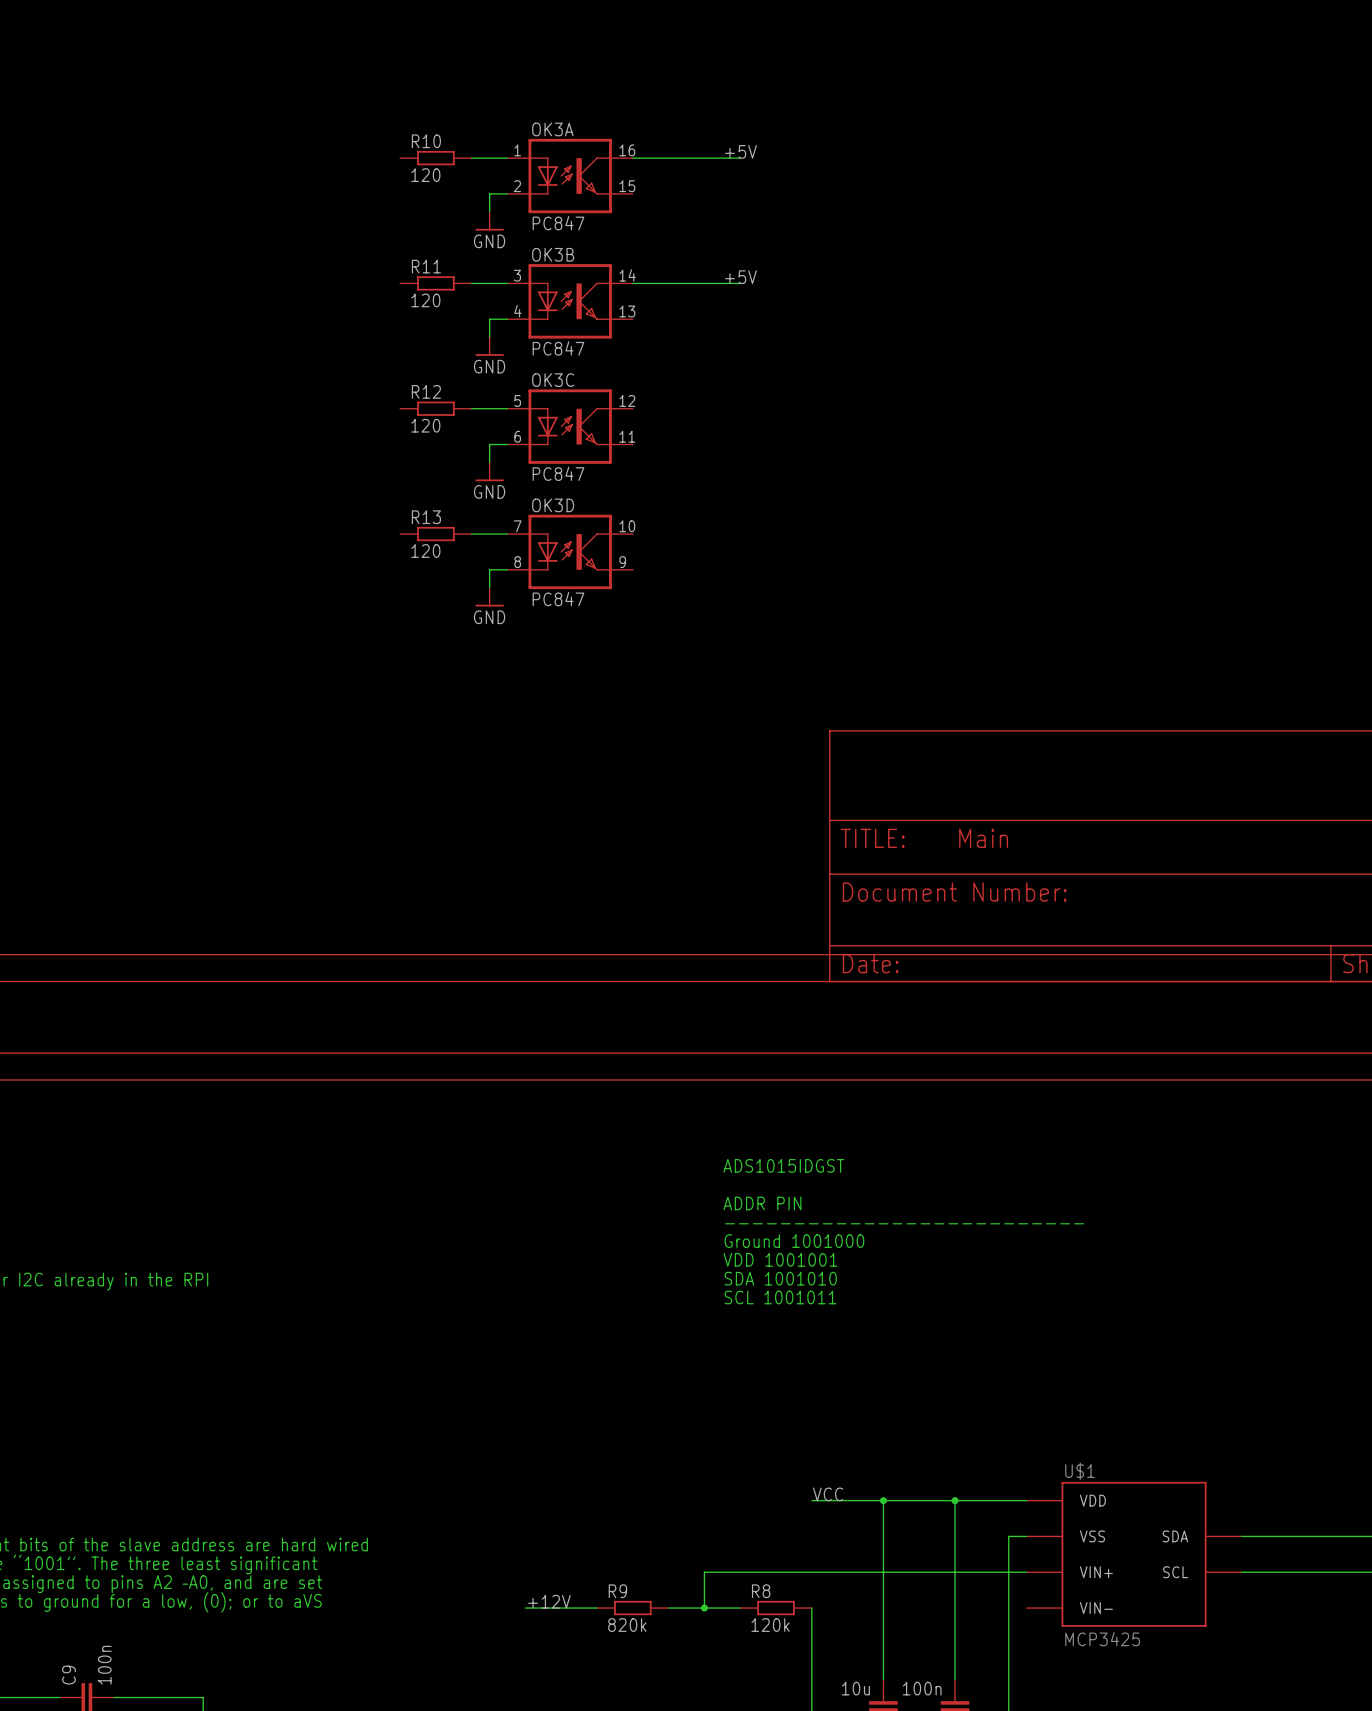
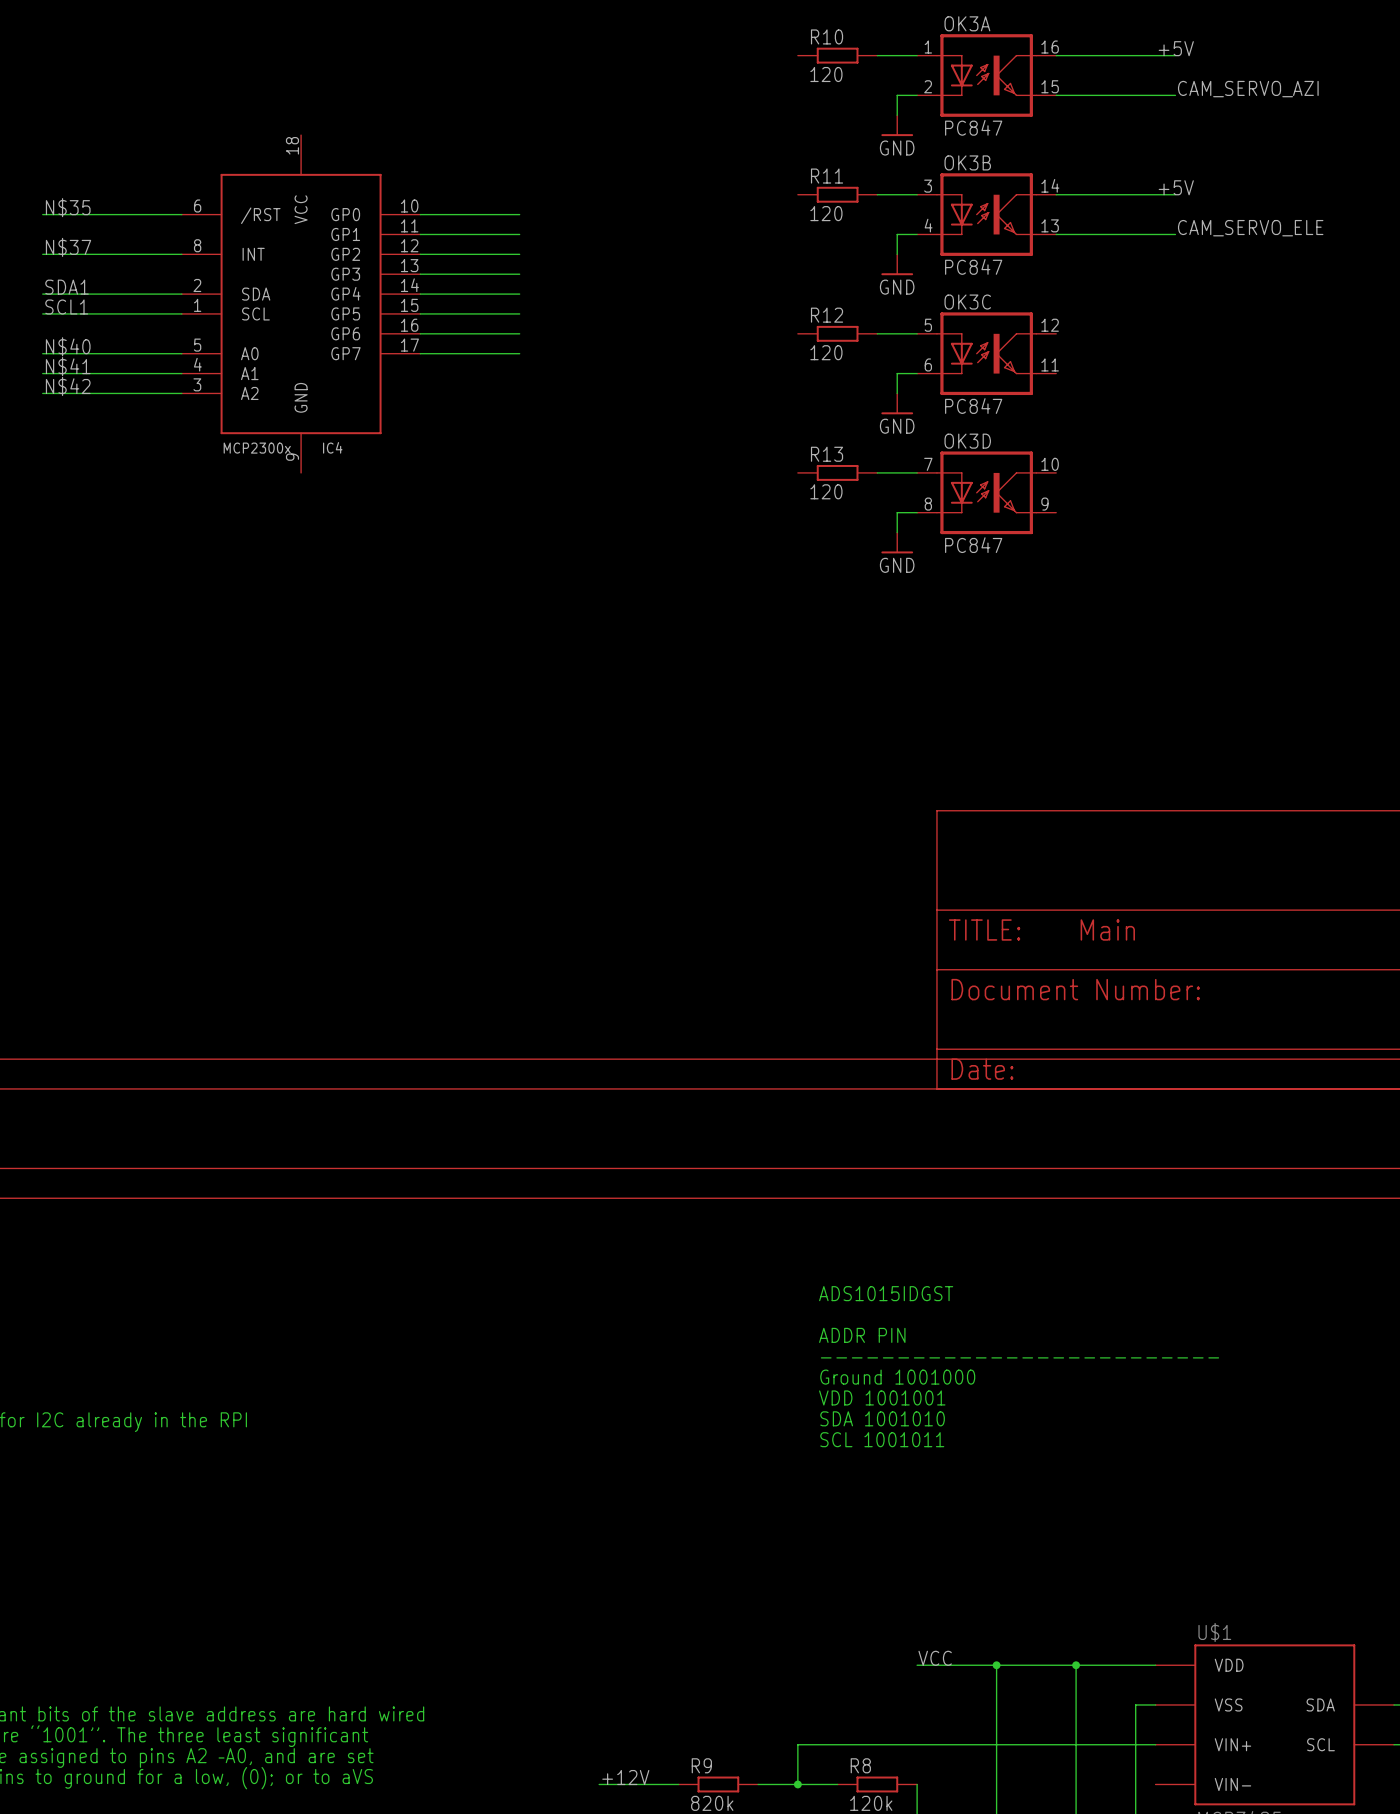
label: none -> +5V (1176, 48)
wire: none -> (877, 55) (917, 55)
wire: none -> (1056, 55) (1175, 55)
label: none -> CAM_SERVO_AZI (1248, 89)
wire: none -> (917, 95) (897, 95) (897, 115)
wire: none -> (1056, 95) (1175, 95)
power symbol: none -> GND (897, 125)
label: +5V (740, 151) -> none
R10 position: (435, 158) -> (837, 55)
wire: (471, 158) (507, 158) -> none
wire: (632, 158) (740, 158) -> none
label: none -> +5V (1176, 187)
OK3A position: (570, 176) -> (986, 75)
wire: none -> (877, 194) (917, 194)
wire: none -> (1056, 194) (1175, 194)
label: none -> N$35 (68, 207)
wire: none -> (42, 214) (181, 214)
wire: none -> (420, 214) (519, 214)
wire: (507, 193) (489, 193) (489, 211) -> none
label: none -> CAM_SERVO_ELE (1250, 228)
wire: none -> (420, 234) (519, 234)
wire: none -> (917, 234) (897, 234) (897, 254)
wire: none -> (1056, 234) (1175, 234)
power symbol: GND (489, 221) -> none
label: none -> N$37 (68, 247)
wire: none -> (42, 254) (181, 254)
wire: none -> (420, 254) (519, 254)
power symbol: none -> GND (897, 264)
wire: none -> (420, 274) (519, 274)
label: none -> SDA1 (67, 287)
wire: none -> (42, 294) (181, 294)
wire: none -> (420, 294) (519, 294)
IC4: none -> (301, 304)
label: none -> SCL1 (66, 307)
label: +5V (740, 277) -> none
wire: none -> (42, 313) (181, 313)
wire: none -> (420, 313) (519, 313)
R11 position: (435, 283) -> (837, 194)
wire: (471, 283) (507, 283) -> none
wire: (632, 283) (740, 283) -> none
wire: none -> (420, 333) (519, 333)
OK3B position: (570, 301) -> (986, 214)
wire: none -> (877, 333) (917, 333)
label: none -> N$40 (68, 346)
wire: none -> (42, 353) (181, 353)
wire: none -> (420, 353) (519, 353)
wire: (507, 319) (489, 319) (489, 337) -> none
label: none -> N$41 (68, 366)
wire: none -> (42, 373) (181, 373)
wire: none -> (917, 373) (897, 373) (897, 393)
power symbol: GND (489, 346) -> none
label: none -> N$42 (68, 386)
wire: none -> (42, 393) (181, 393)
power symbol: none -> GND (897, 403)
R12 position: (435, 408) -> (837, 333)
wire: (471, 408) (507, 408) -> none
OK3C position: (570, 426) -> (986, 353)
wire: none -> (877, 472) (917, 472)
wire: (507, 444) (489, 444) (489, 462) -> none
wire: none -> (917, 512) (897, 512) (897, 532)
power symbol: GND (489, 471) -> none
power symbol: none -> GND (897, 542)
R13 position: (435, 534) -> (837, 472)
wire: (471, 534) (507, 534) -> none
OK3D position: (570, 551) -> (986, 492)
wire: (507, 569) (489, 569) (489, 587) -> none
power symbol: GND (489, 597) -> none

